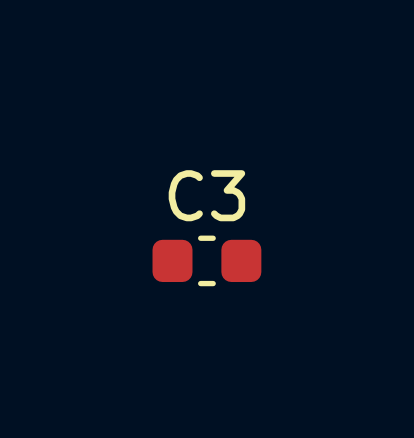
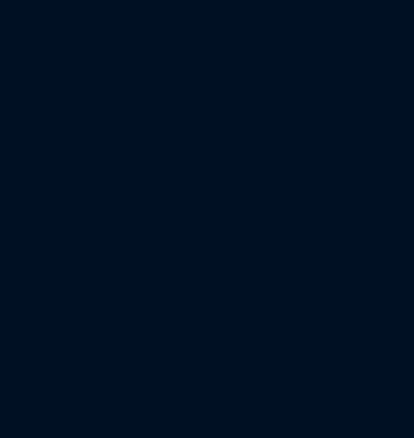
C3: (206, 260) -> none

